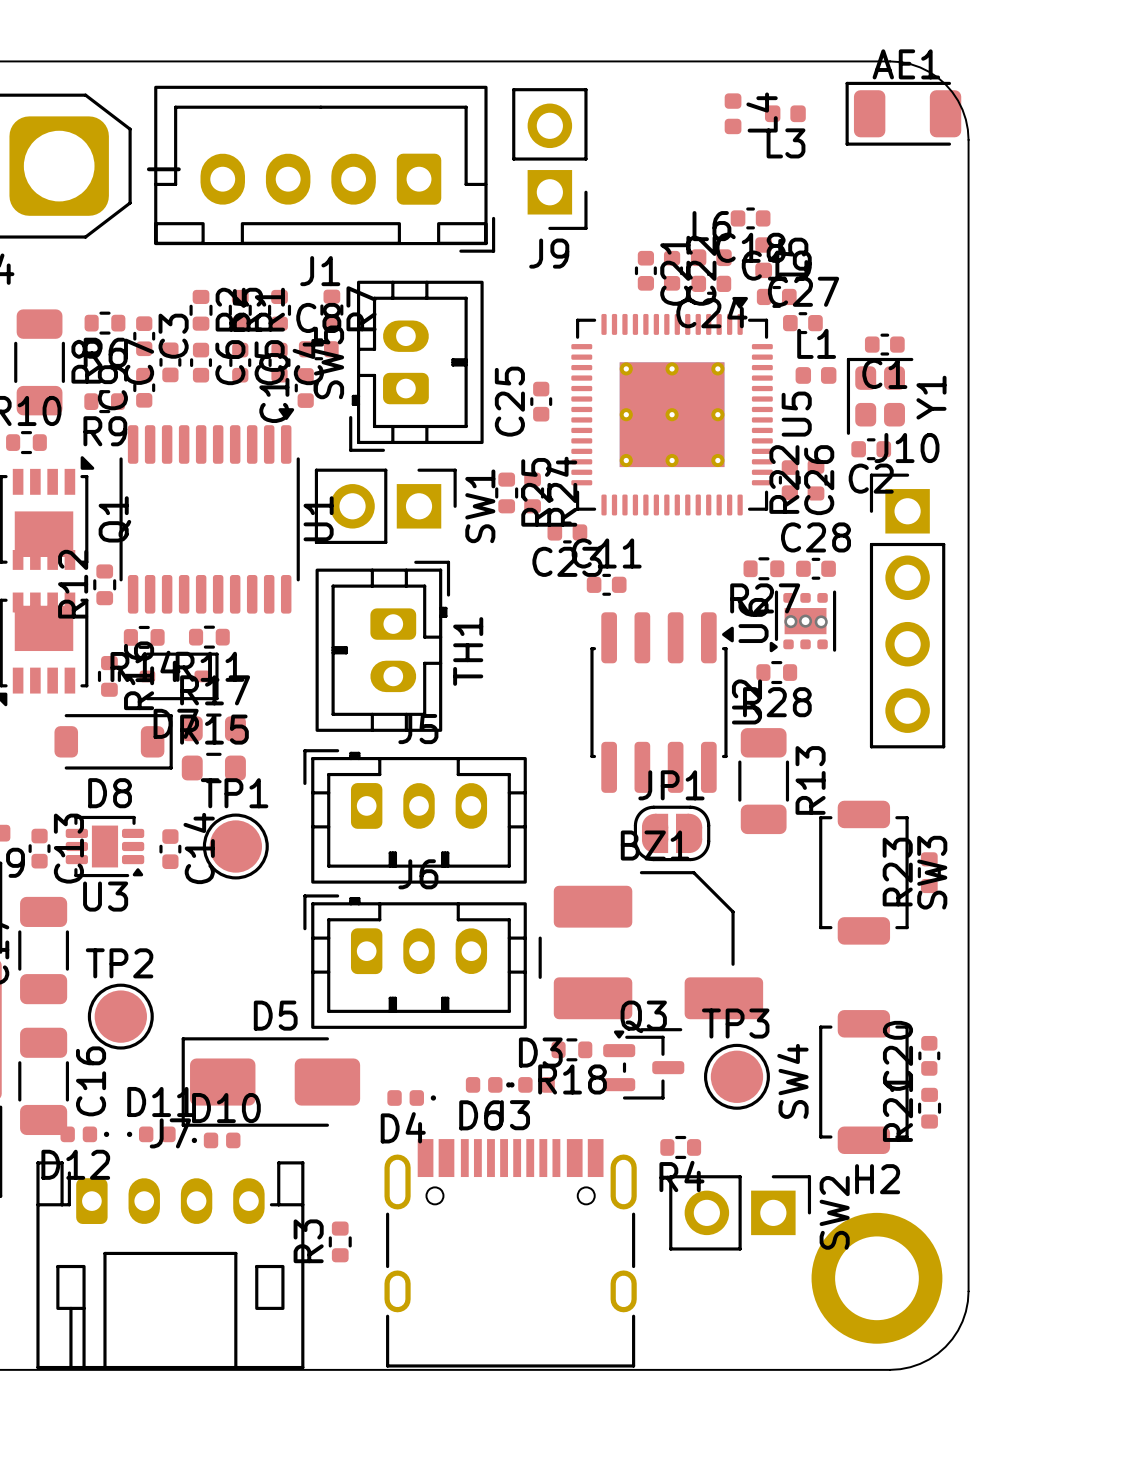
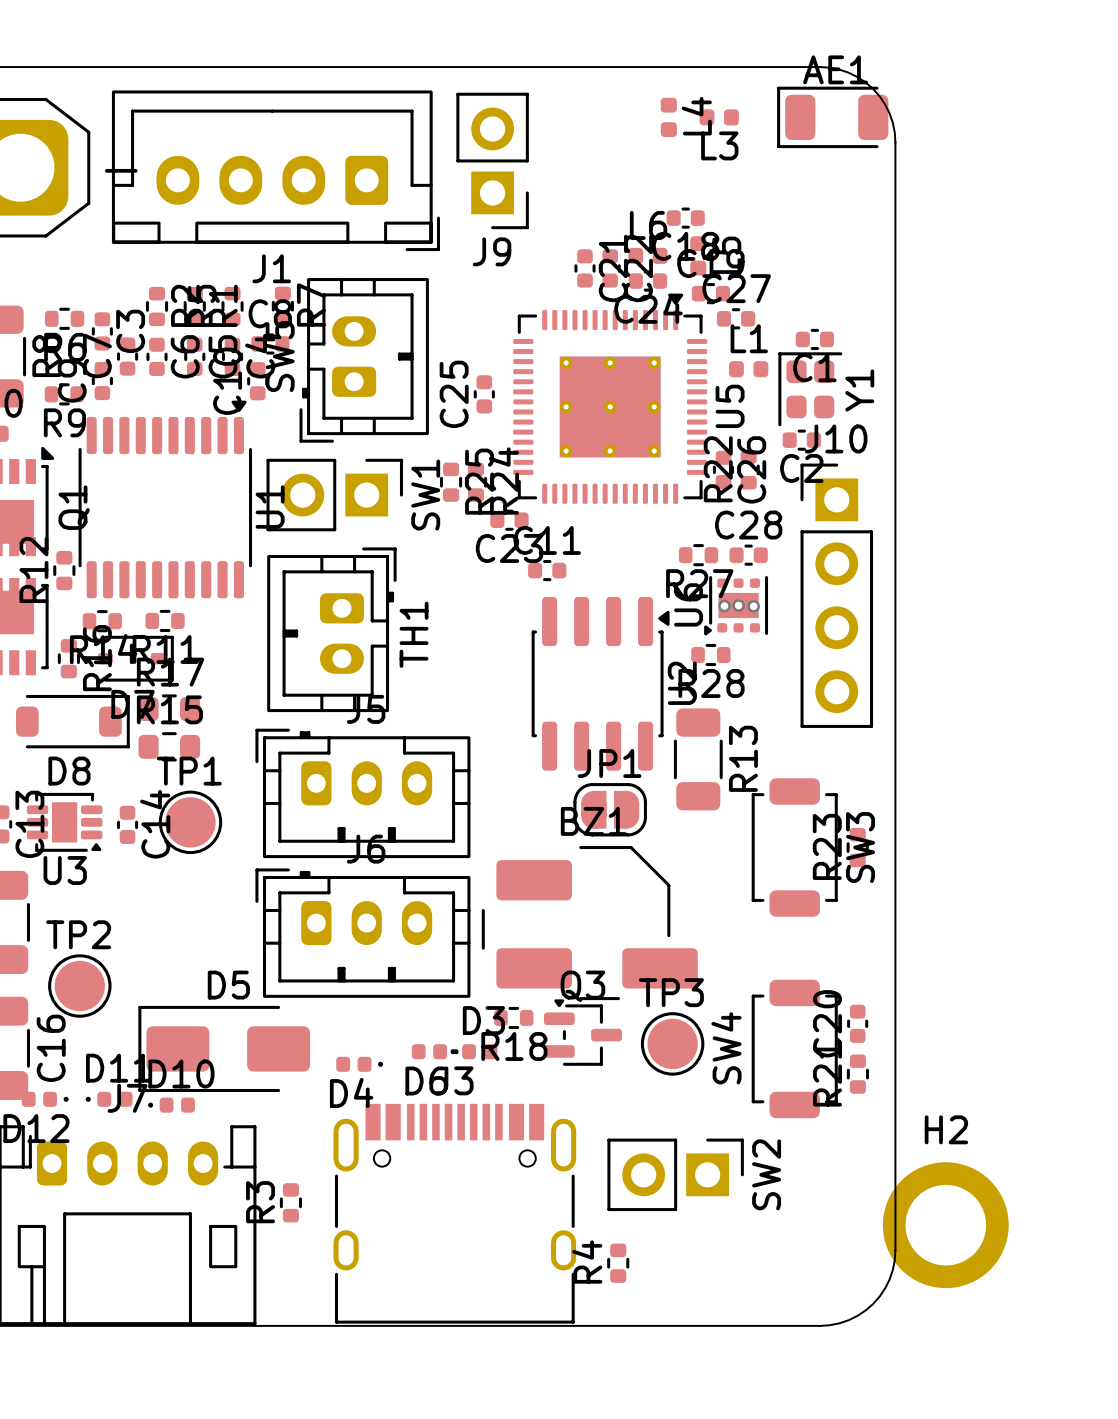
R4 rotation: 0° (680, 1147) -> 90° clockwise (618, 1263)
R4 position: (680, 1147) -> (618, 1263)
H2 position: (876, 1278) -> (945, 1225)

